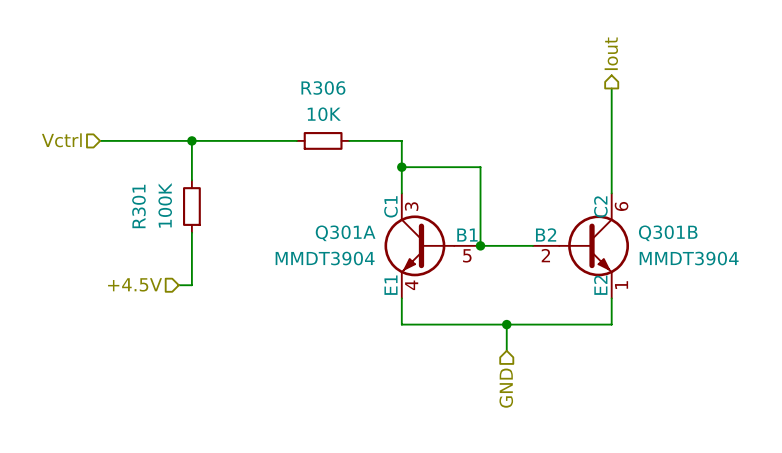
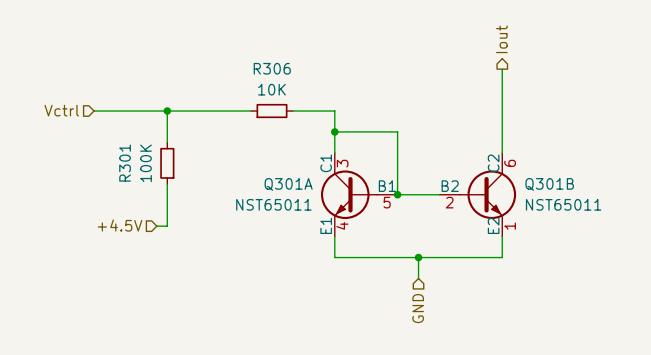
Q301A value: MMDT3904 (325, 258) -> NST65011 (273, 204)
Q301B value: MMDT3904 (689, 258) -> NST65011 (563, 204)

